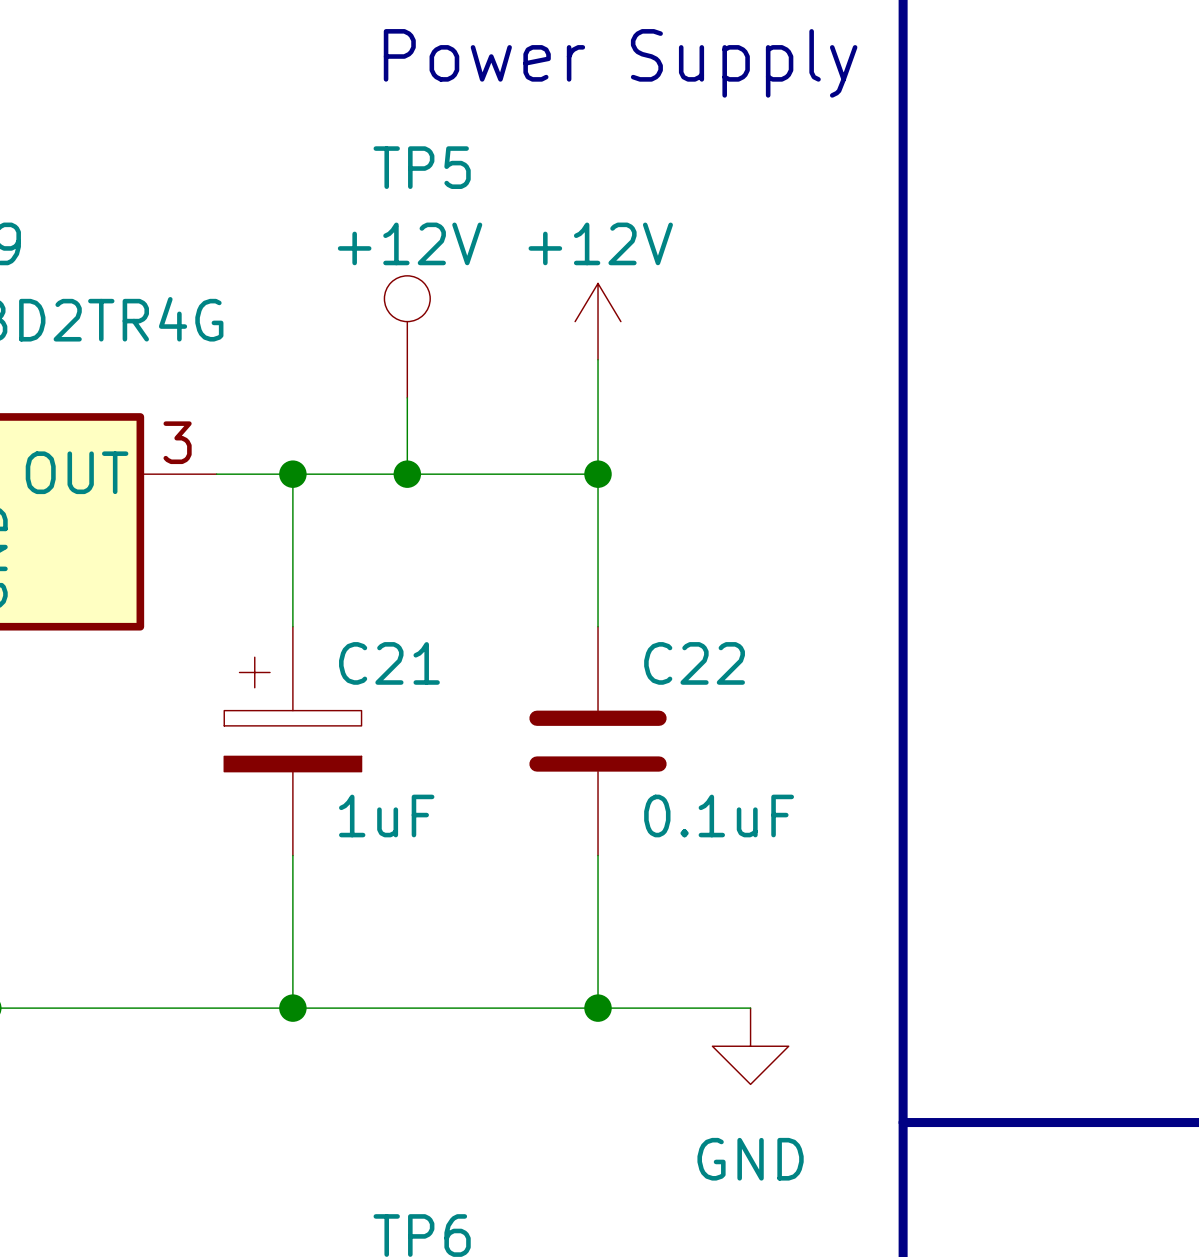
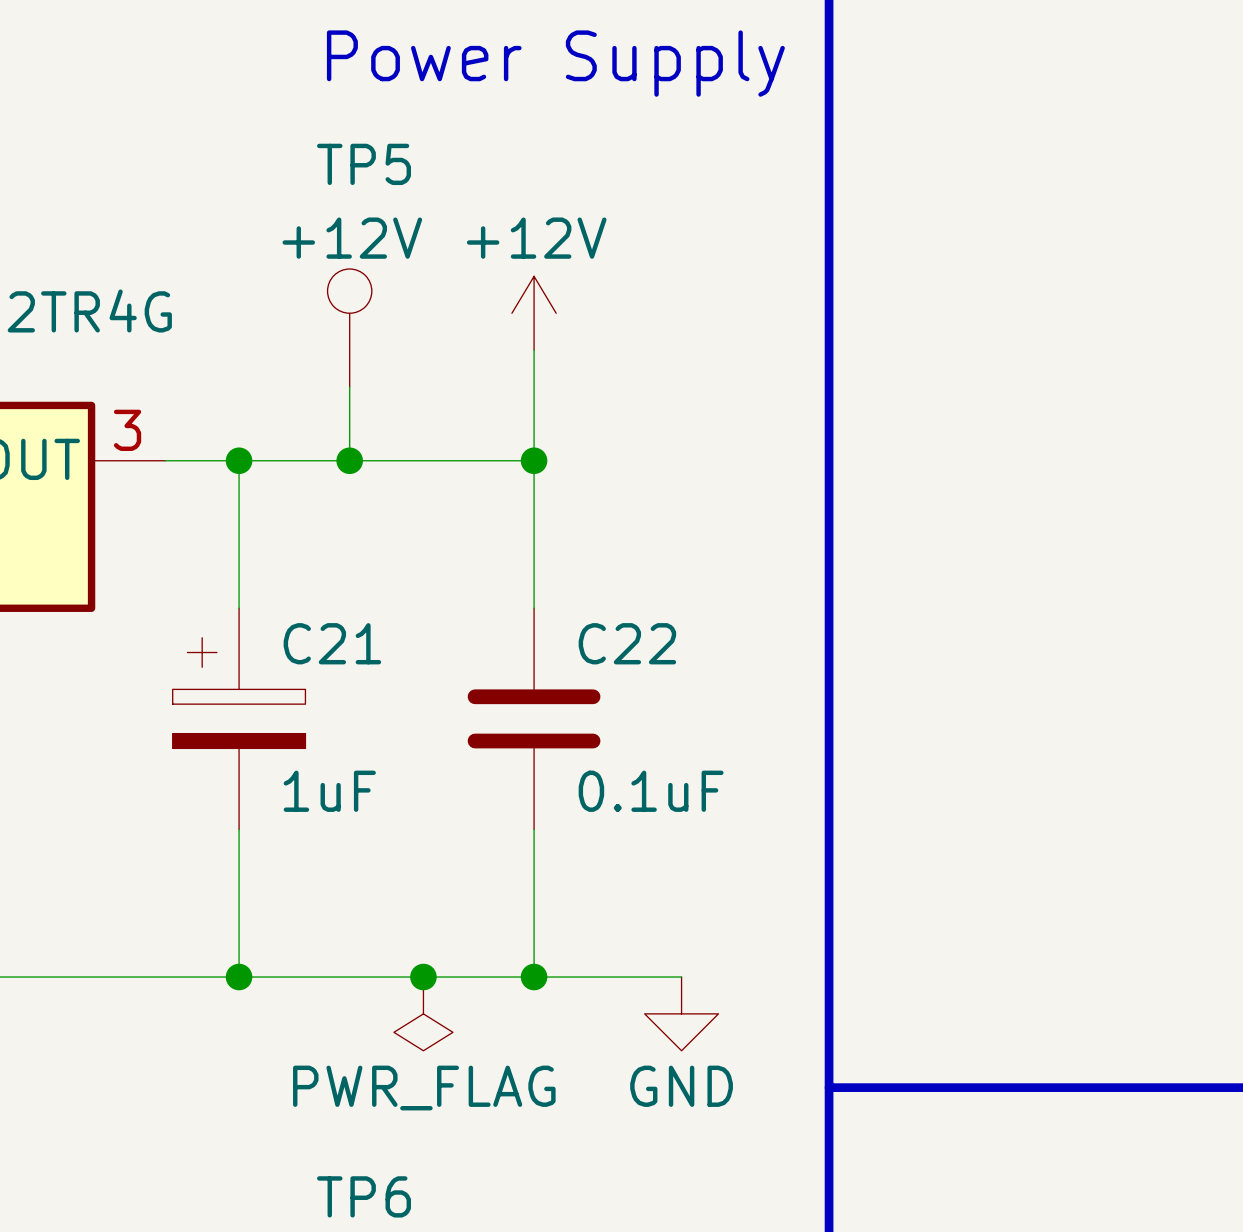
junction: none -> (423, 977)
power symbol: none -> PWR_FLAG (423, 1013)
power symbol text position: GND (750, 1159) -> GND (681, 1086)

